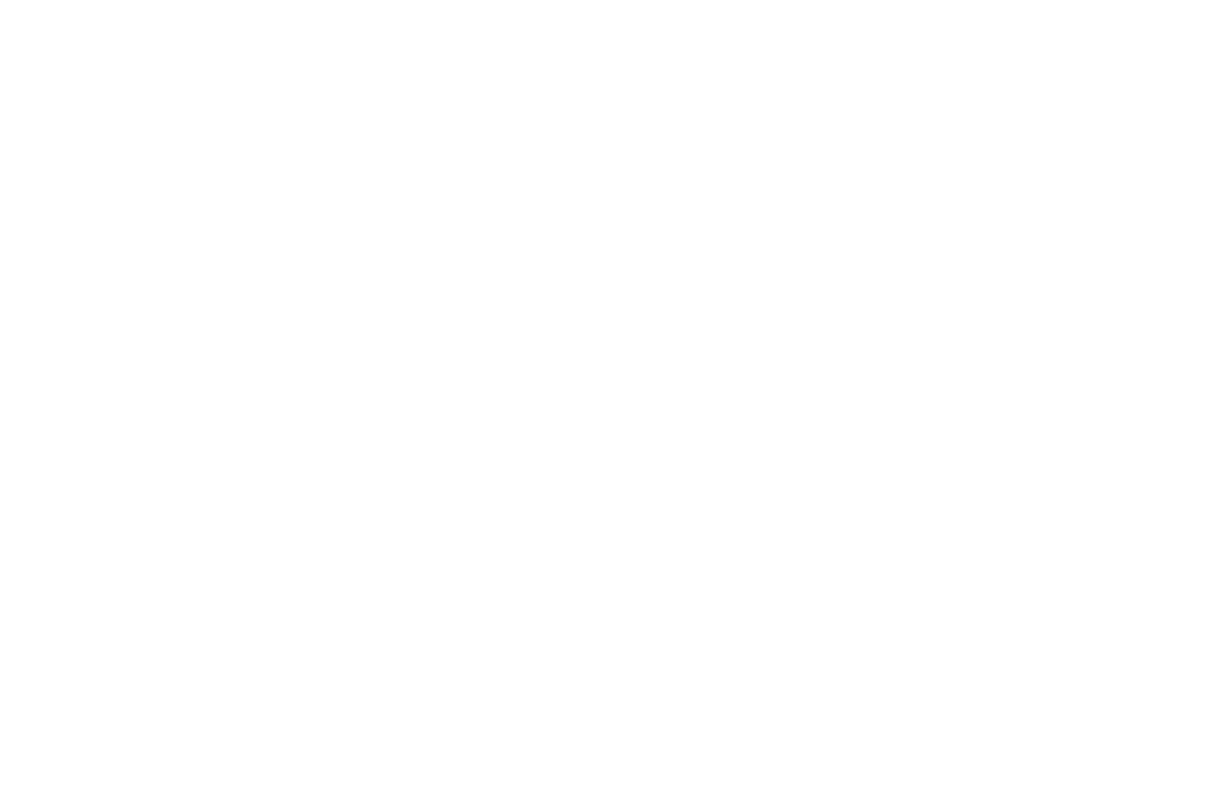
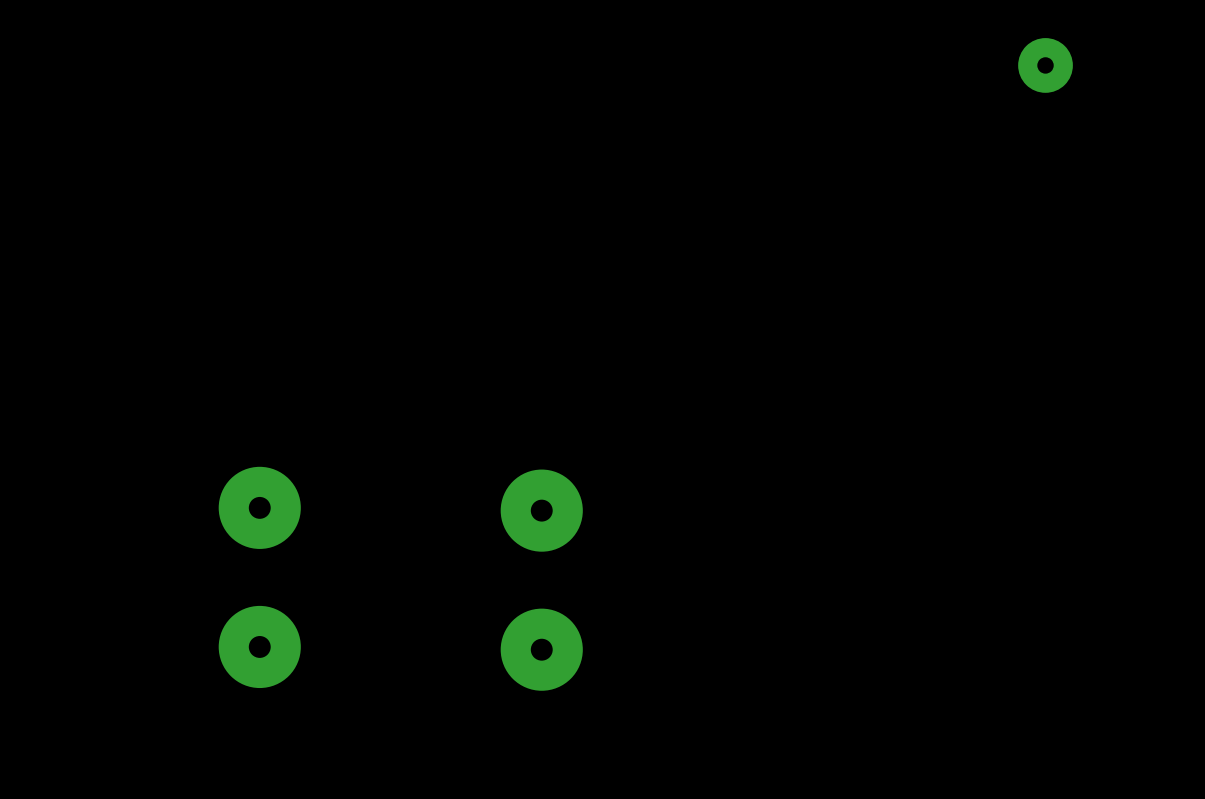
via: none -> (1045, 65)
part: none -> (259, 577)
part: none -> (541, 580)

